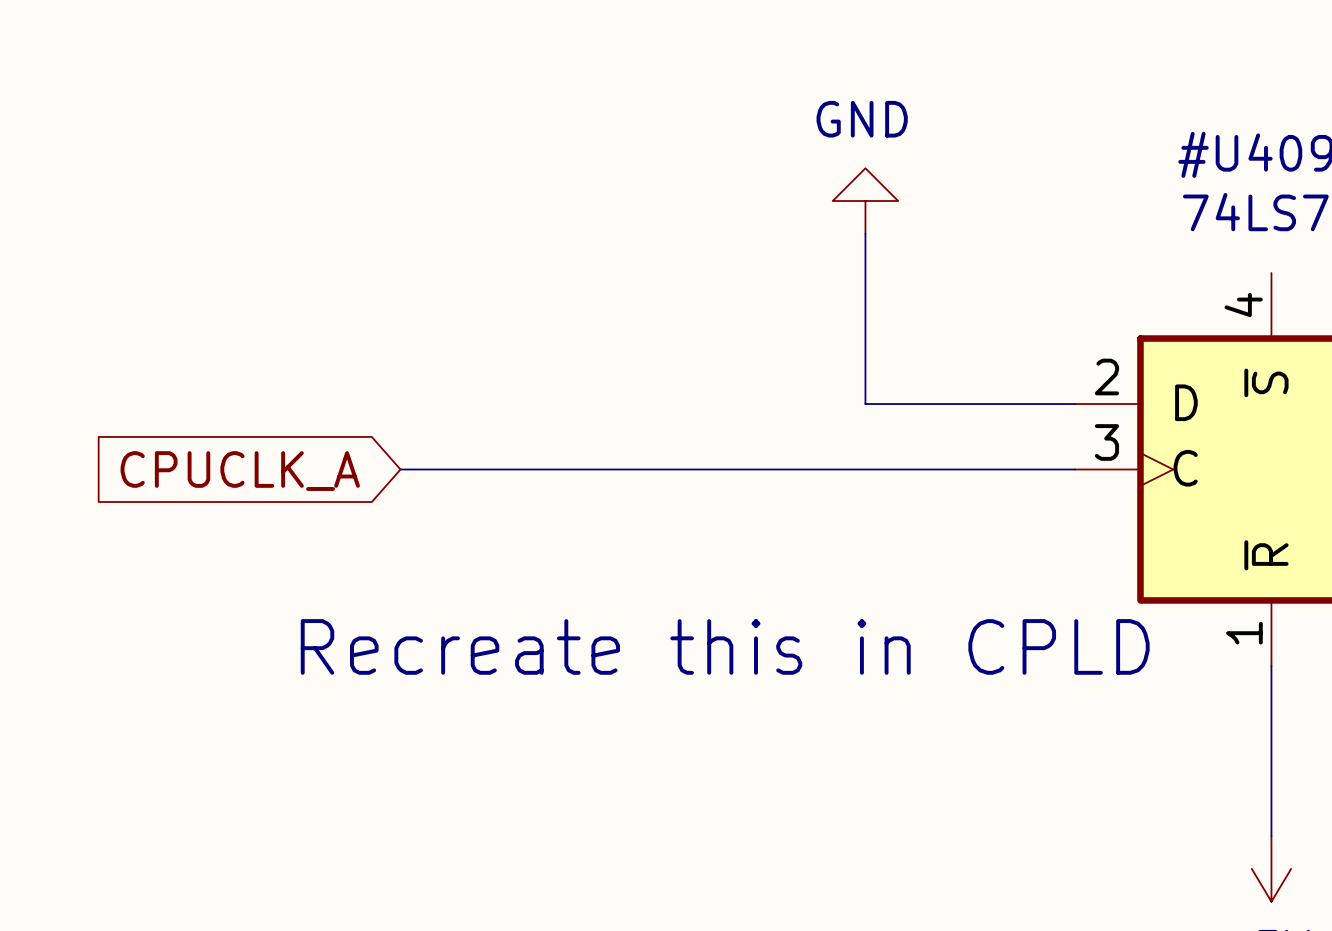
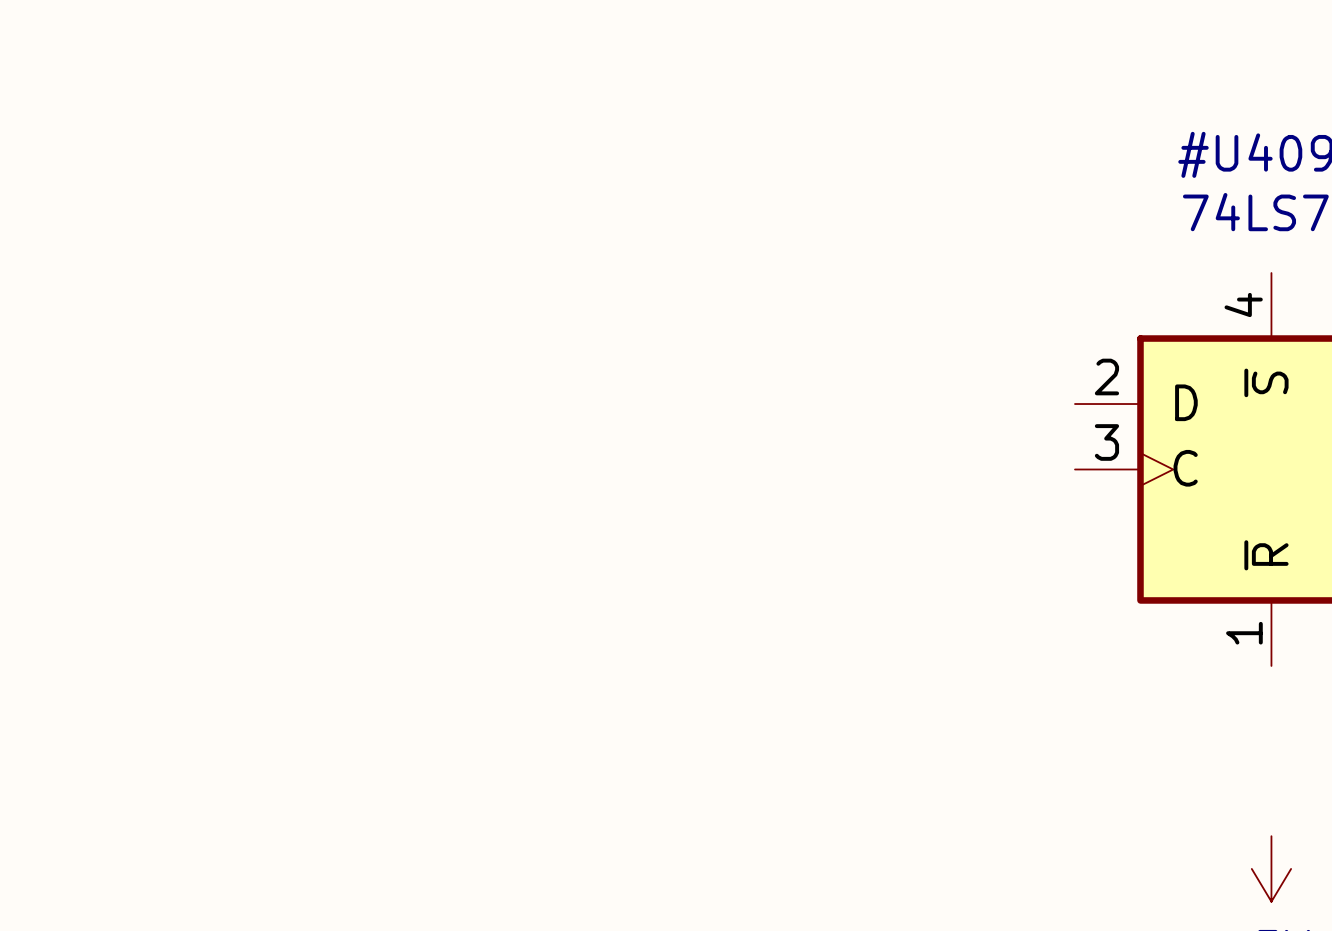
power symbol: GND (865, 201) -> none
wire: (865, 233) (865, 404) (1075, 404) -> none
wire: (400, 469) (1075, 469) -> none
global label: CPUCLK_A (240, 471) -> none
text: Recreate this in CPLD (725, 646) -> none
wire: (1271, 665) (1271, 836) -> none

